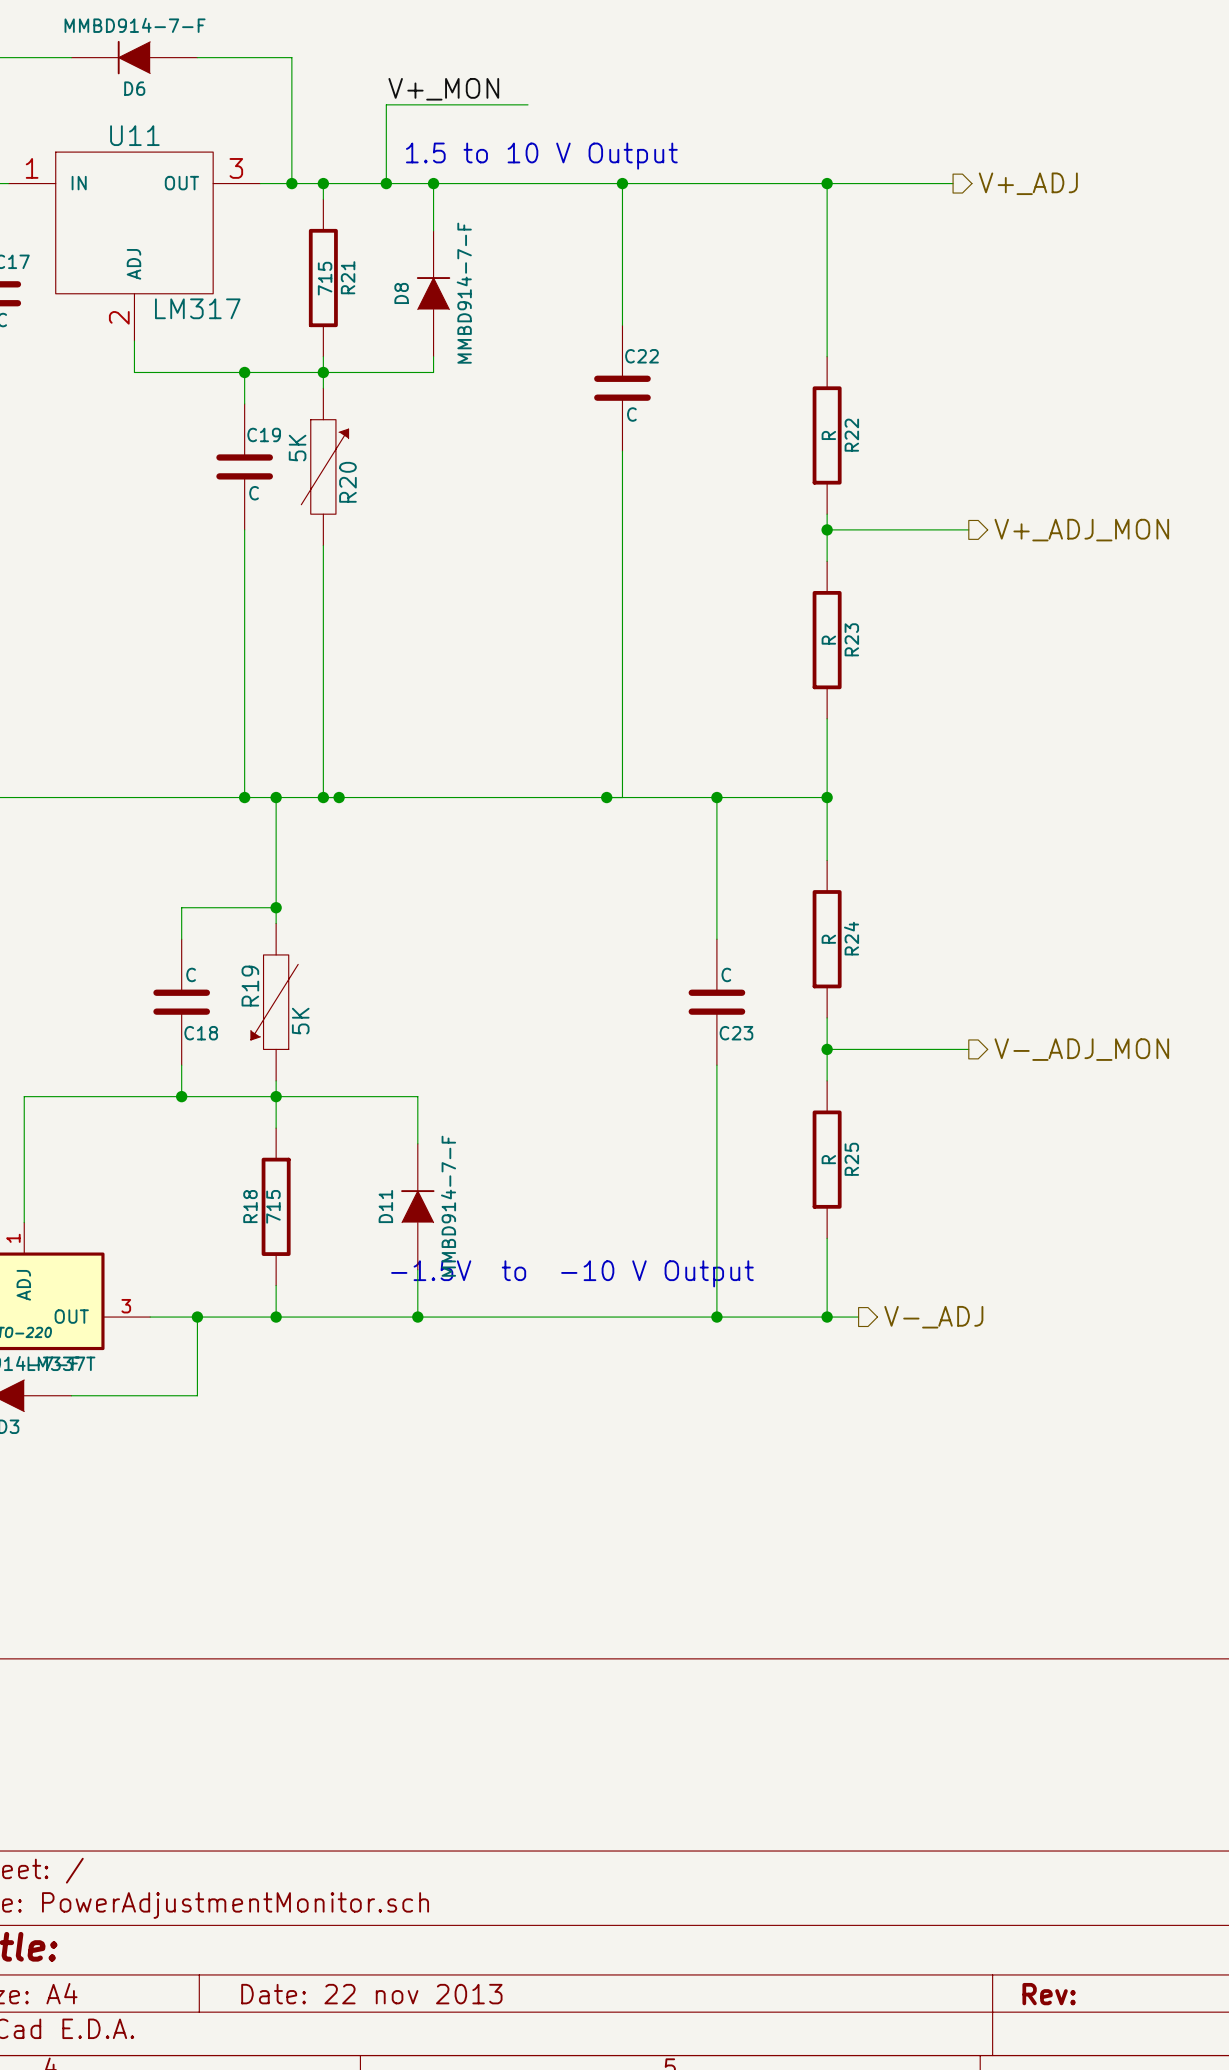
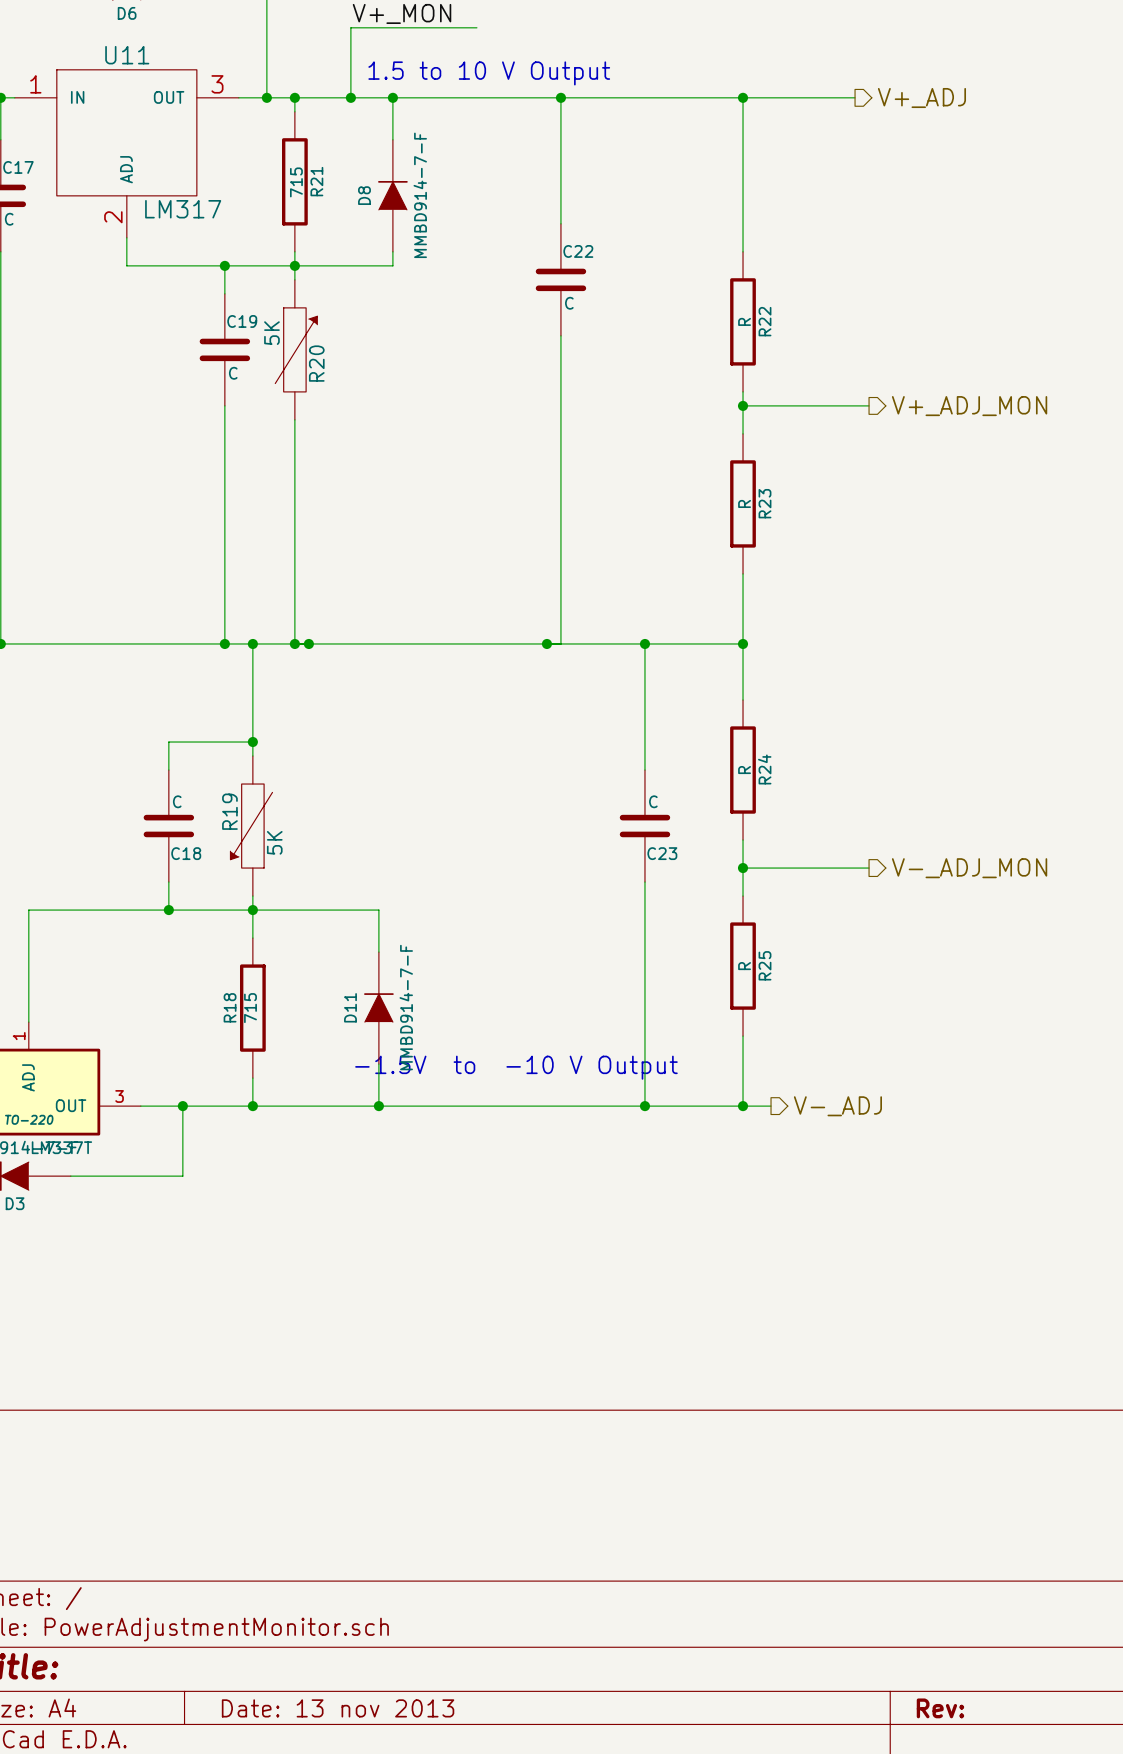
title block: Date: 22 nov 2013 (371, 1994) -> Date: 13 nov 2013 (338, 1708)

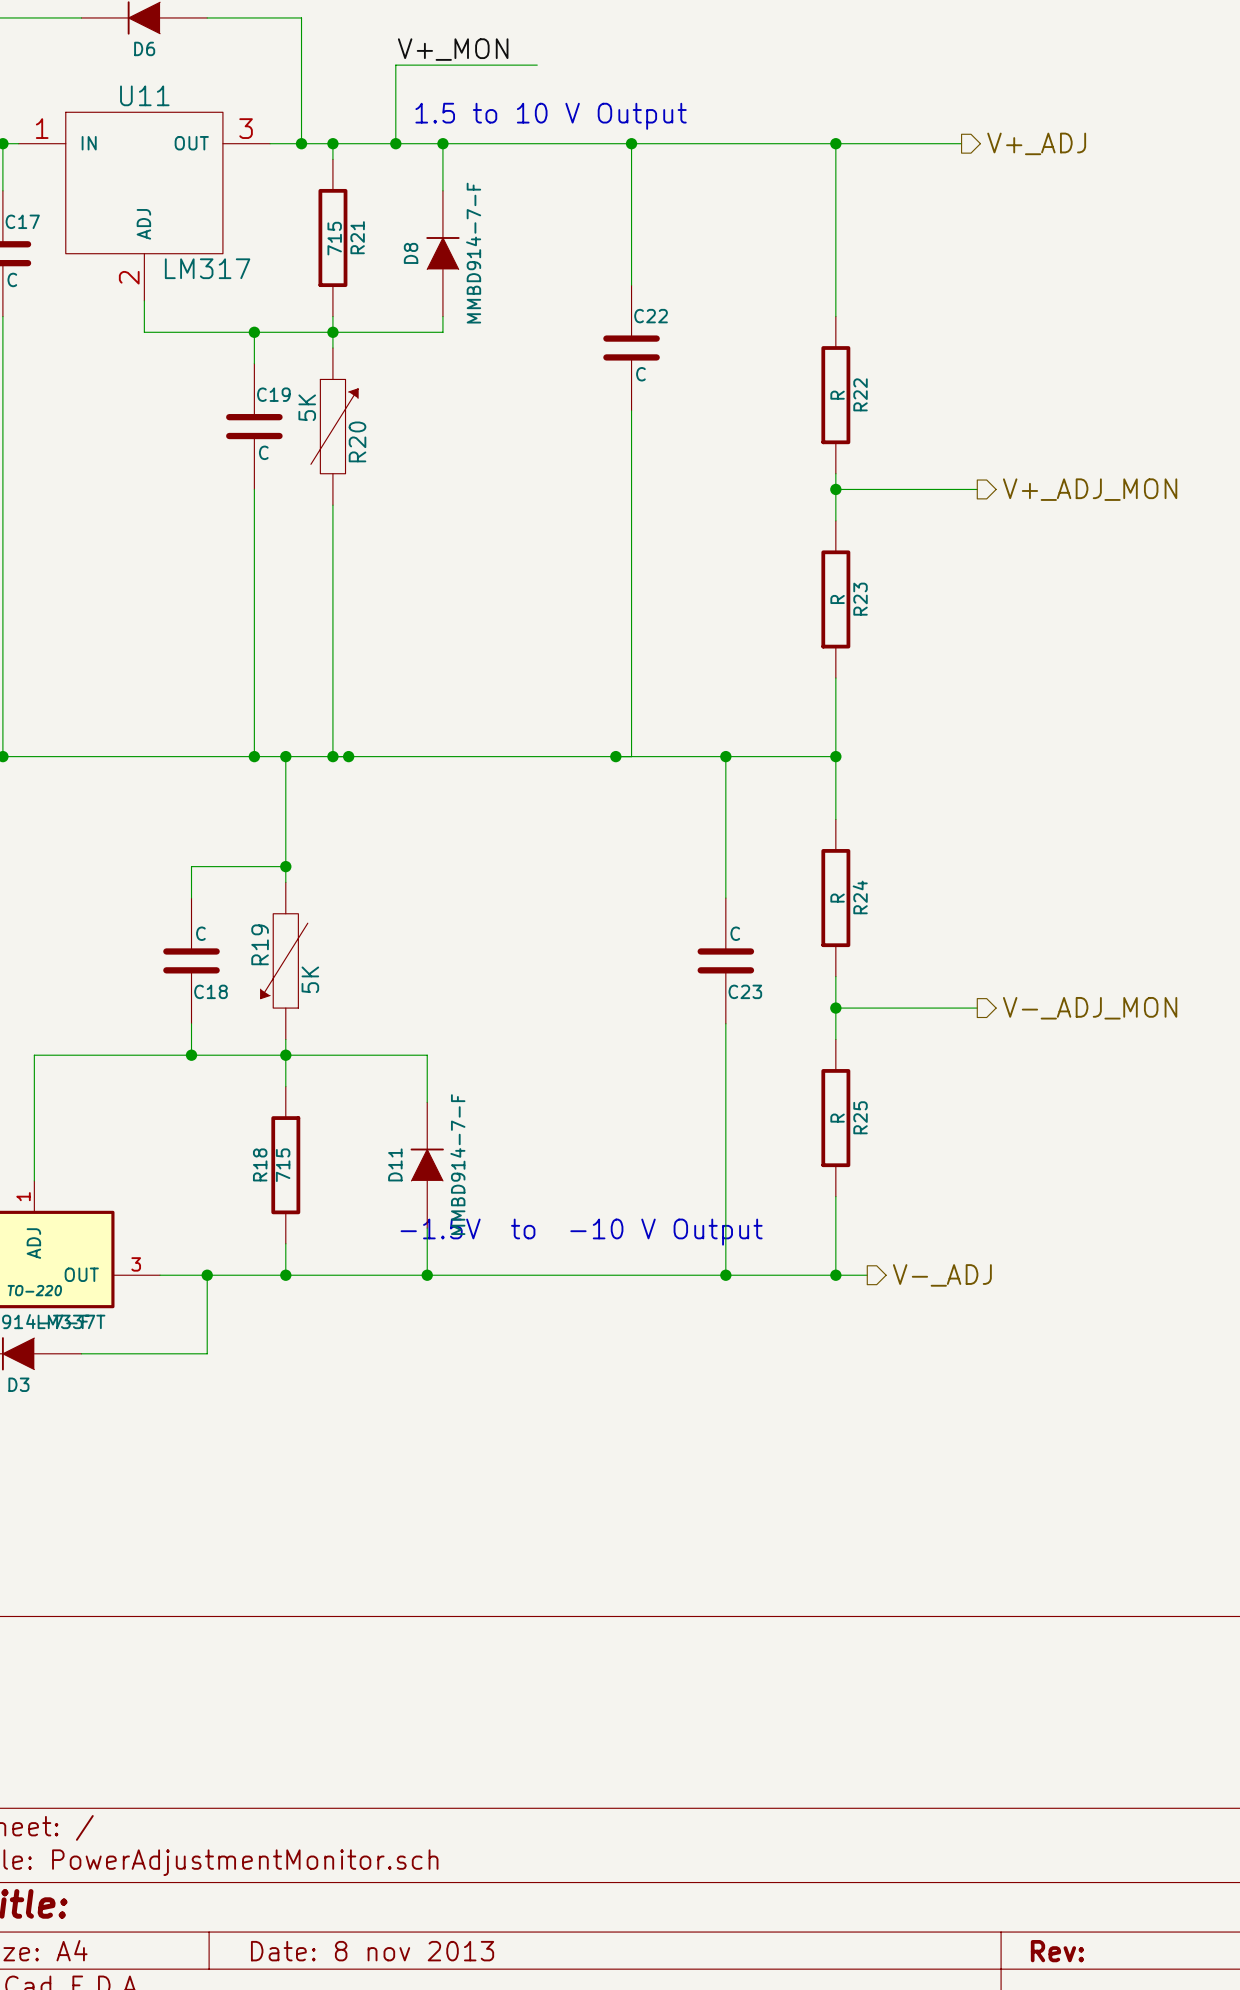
title block: Date: 13 nov 2013 (338, 1708) -> Date: 8 nov 2013 (372, 1951)

